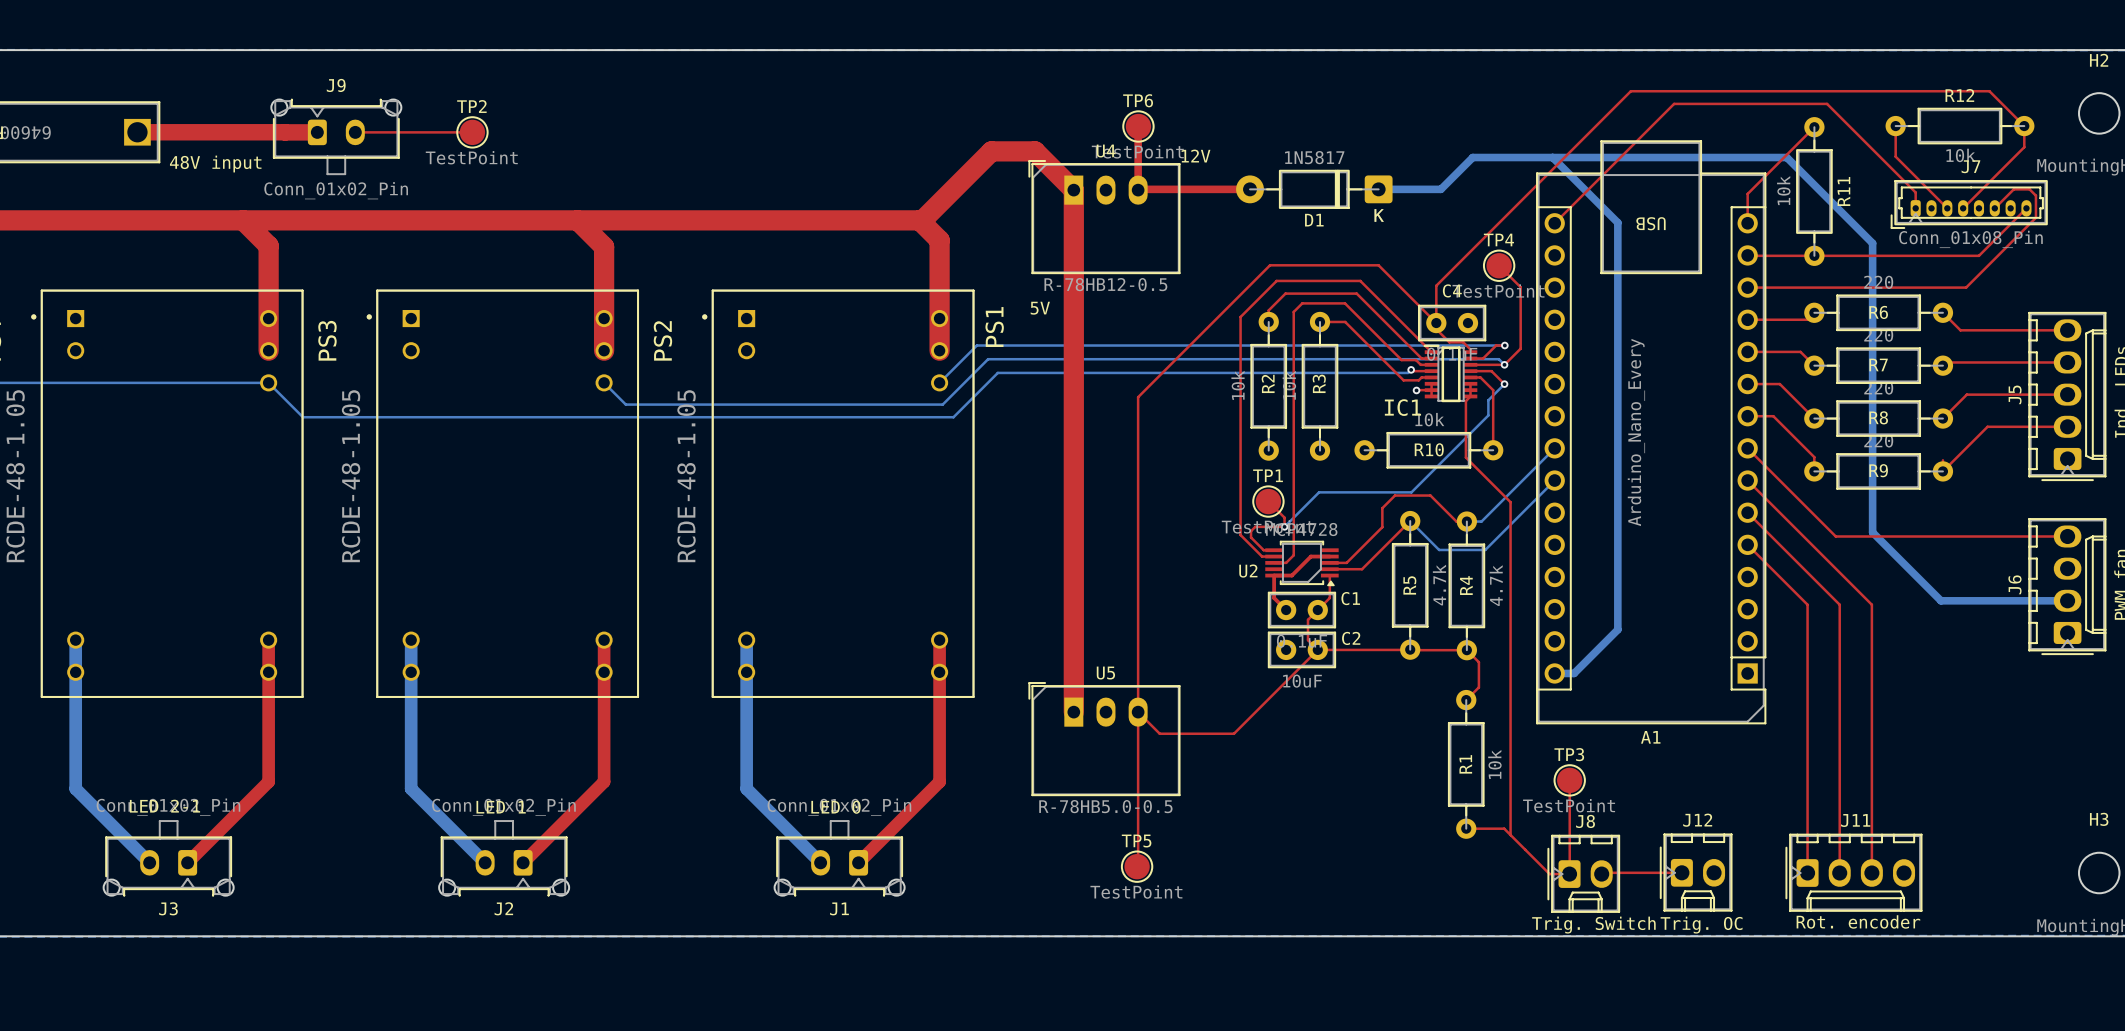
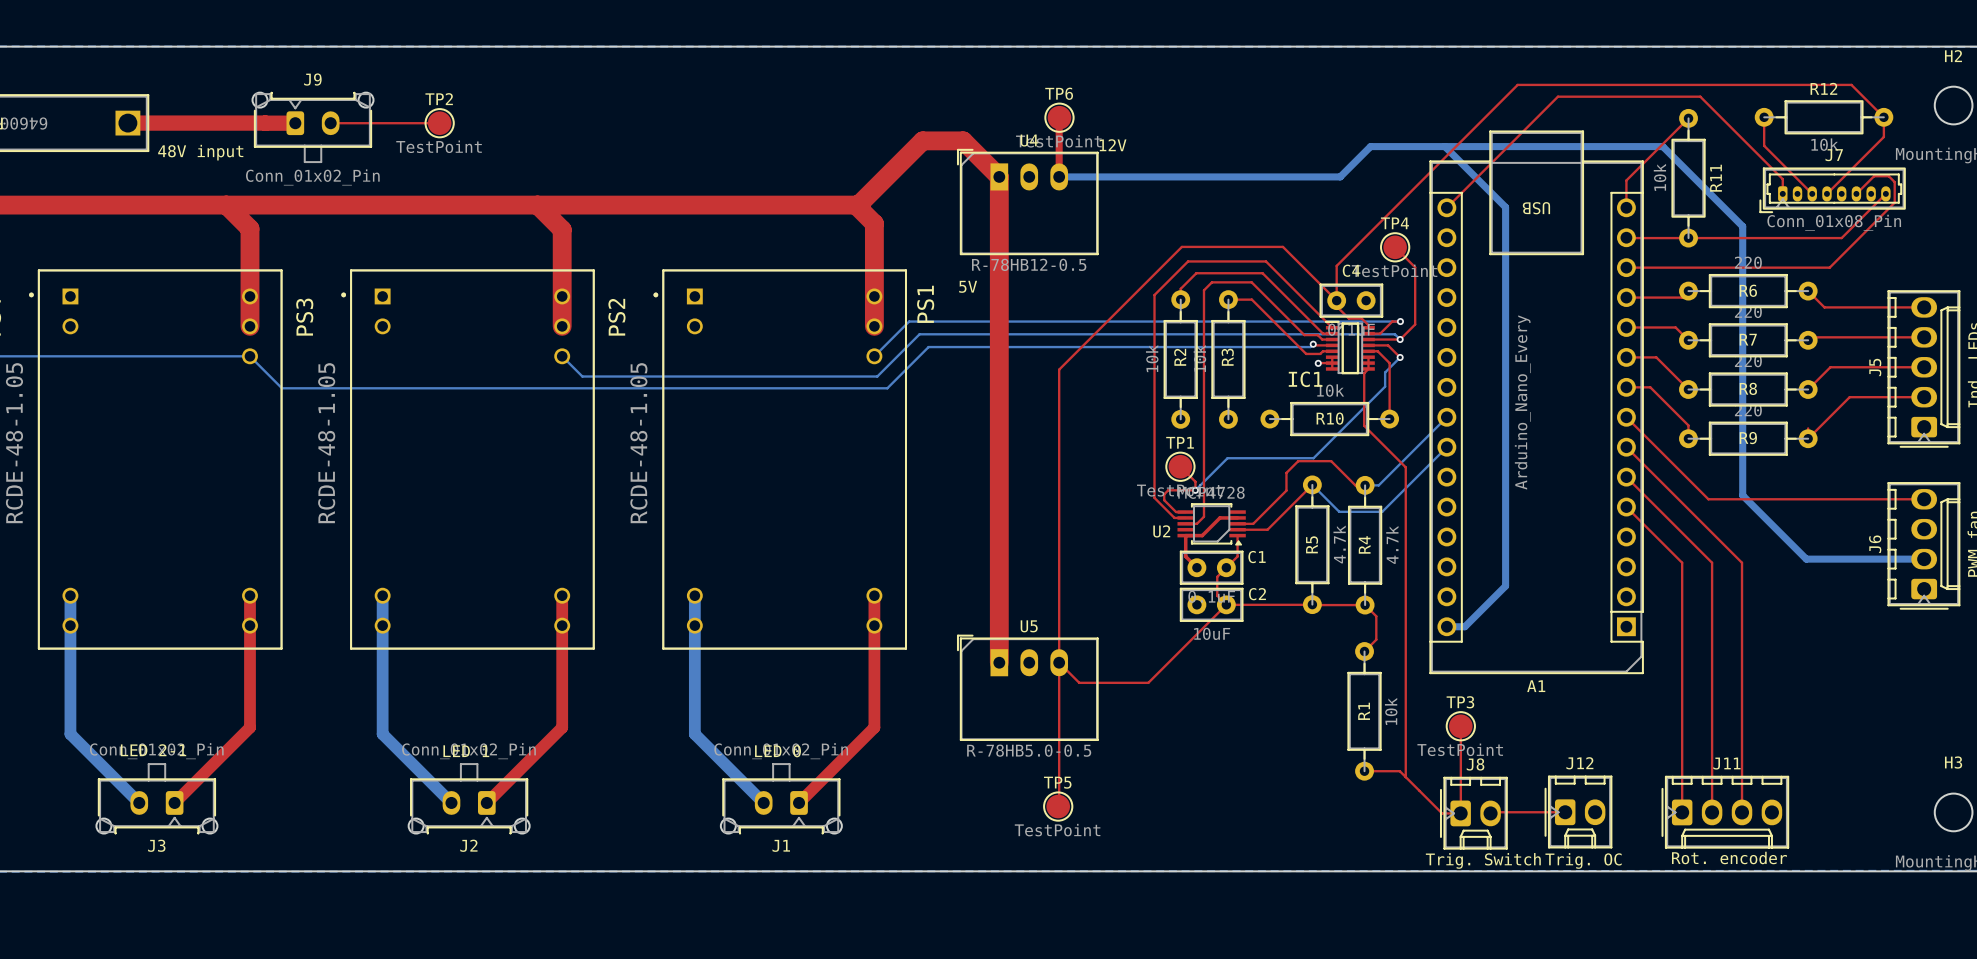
top track: (1250, 189) (1138, 190) -> none
D1: 1N5817 (1314, 189) -> none
bottom track: (1378, 189) (1440, 189) -> (1059, 176) (1340, 176)

